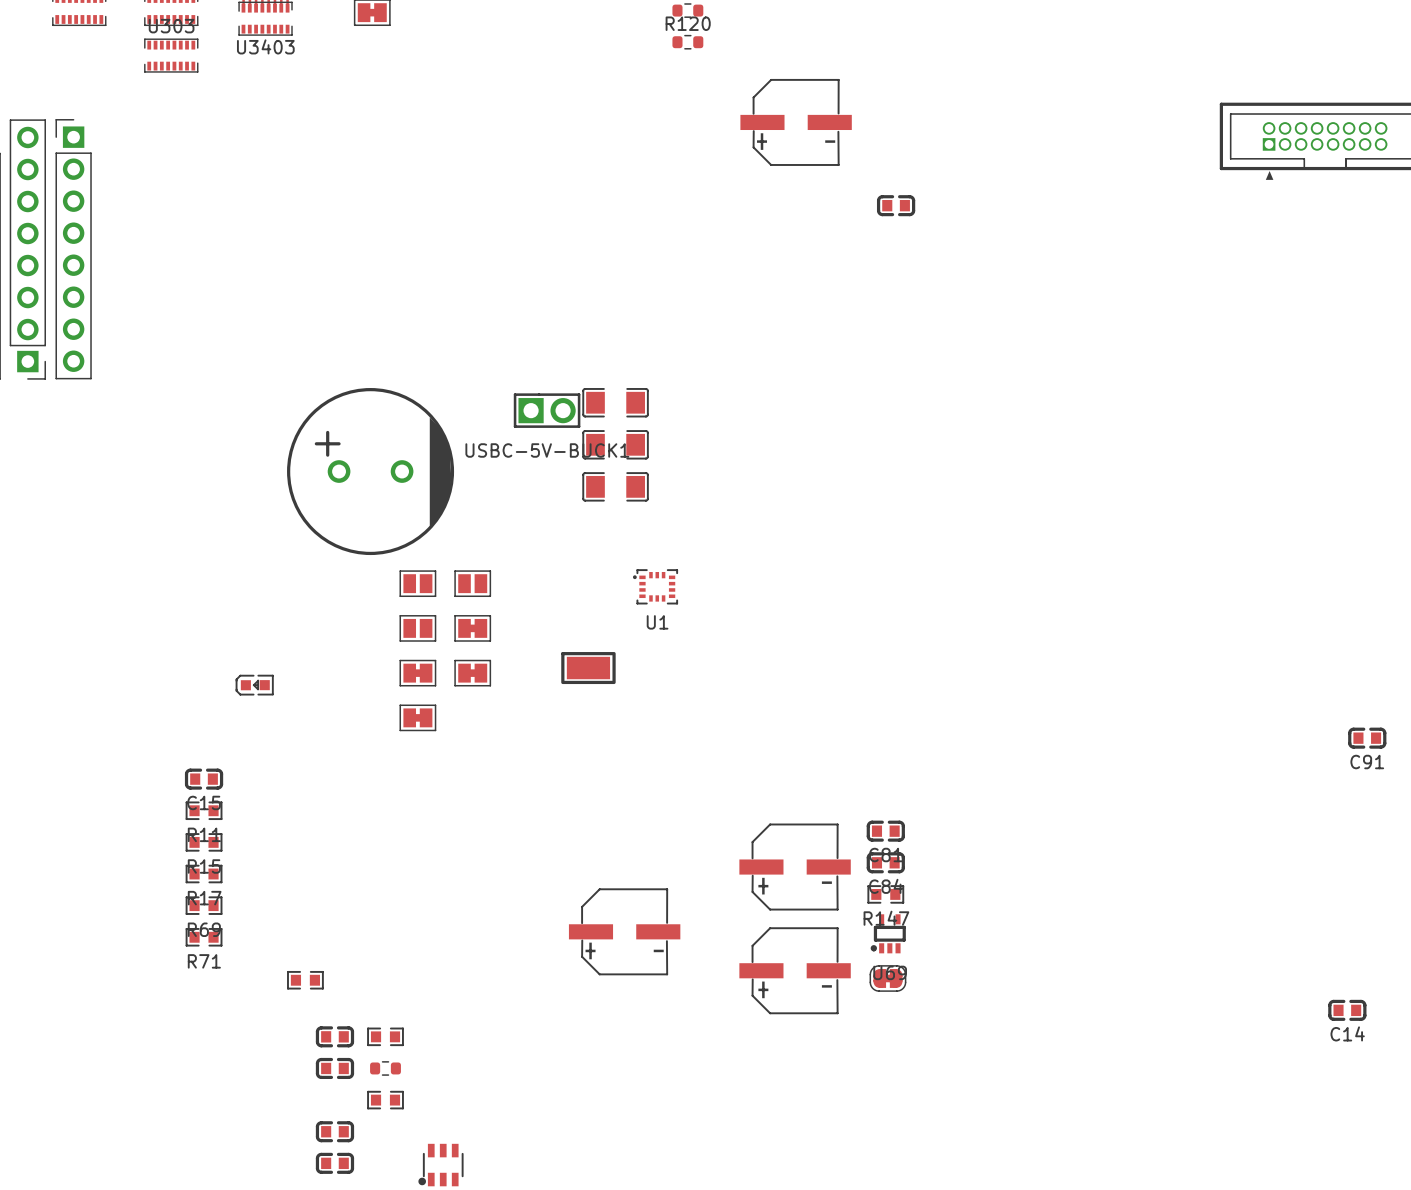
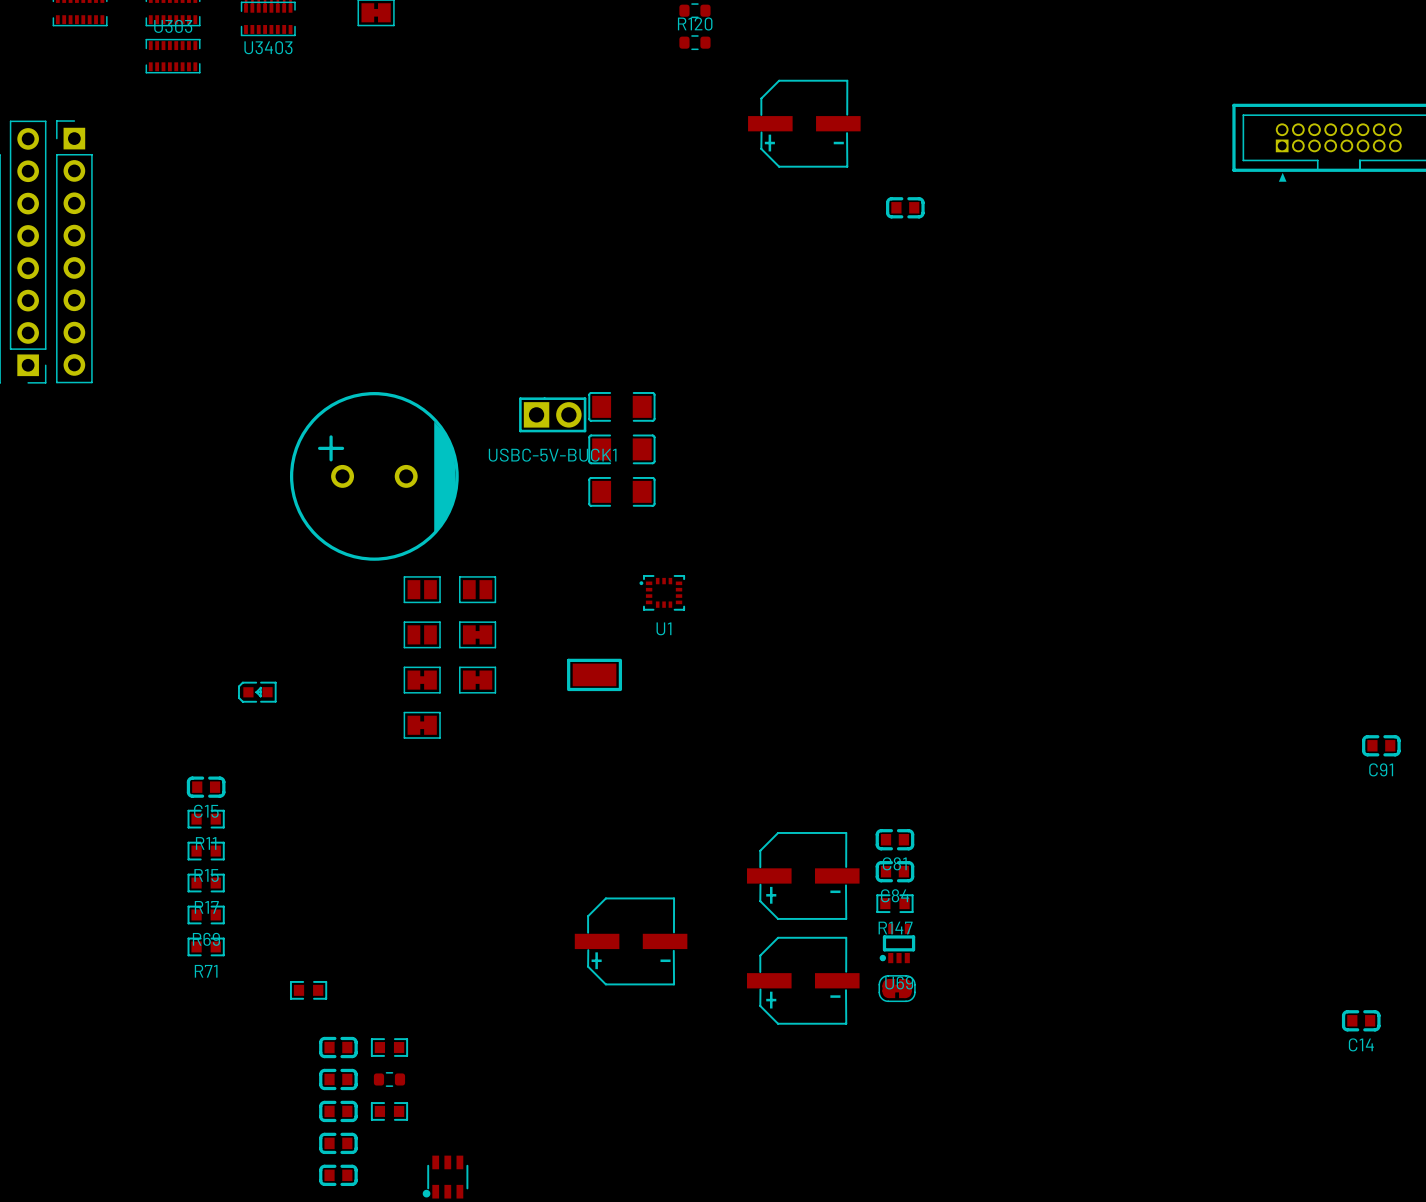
part: none -> (338, 1111)

